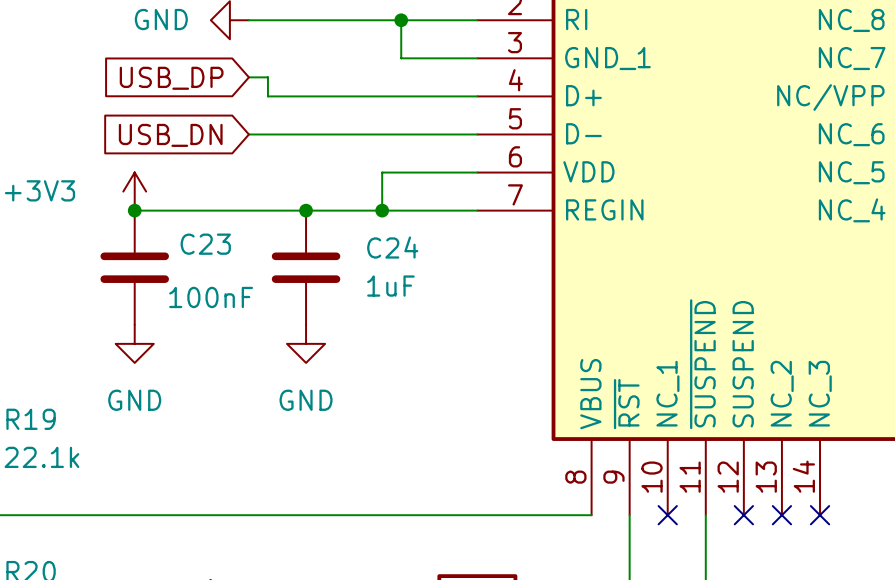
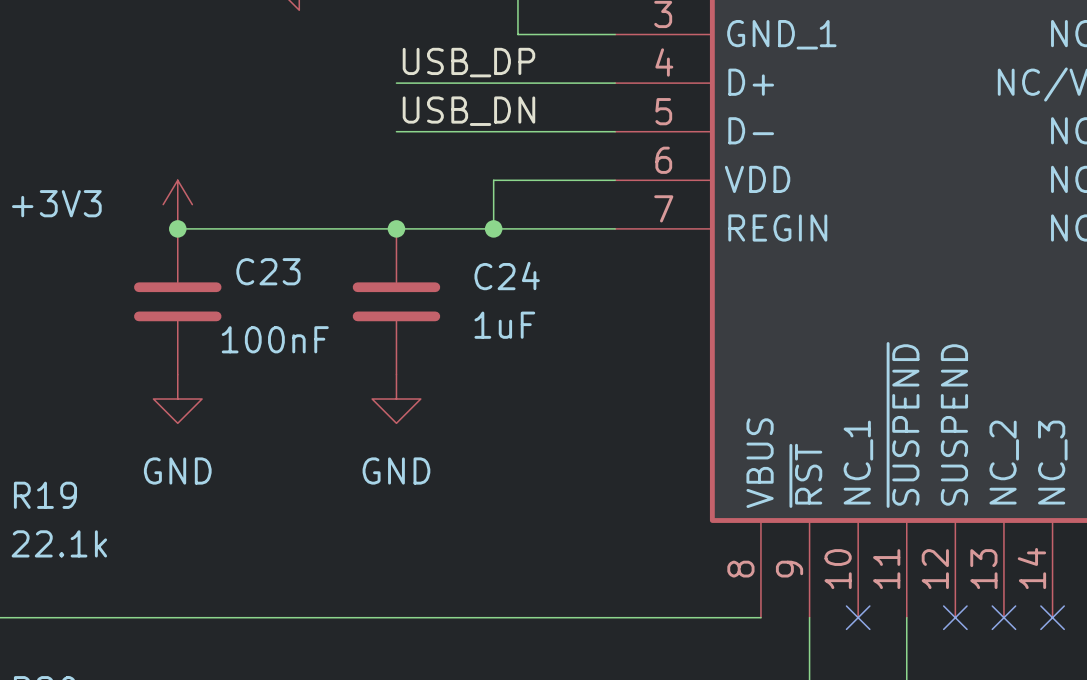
wire: (248, 77) (267, 77) (267, 96) (306, 96) -> none
global label: USB_DP (171, 78) -> none
label: none -> USB_DP (468, 62)
label: none -> USB_DN (468, 111)
wire: (248, 134) (306, 134) -> none
global label: USB_DN (170, 135) -> none

